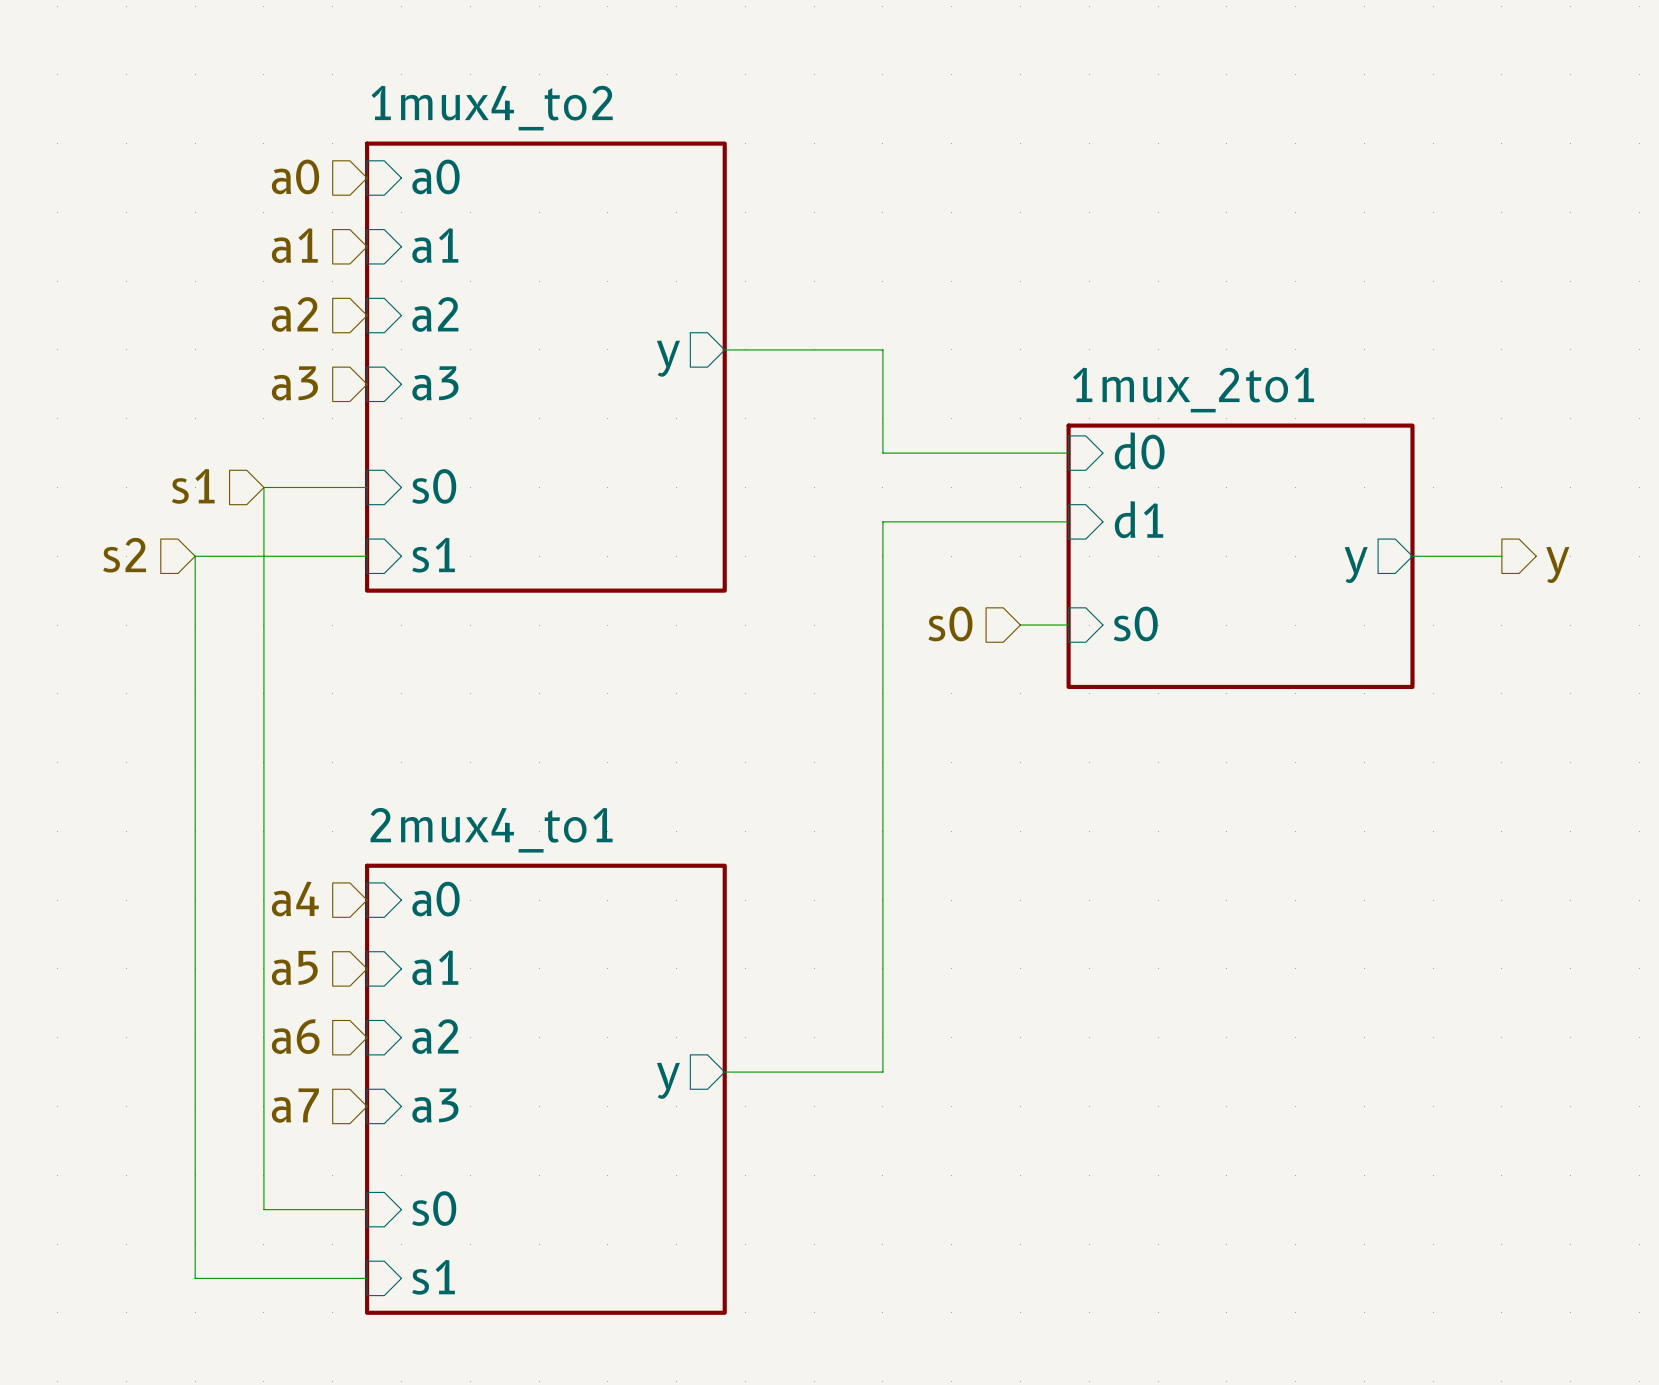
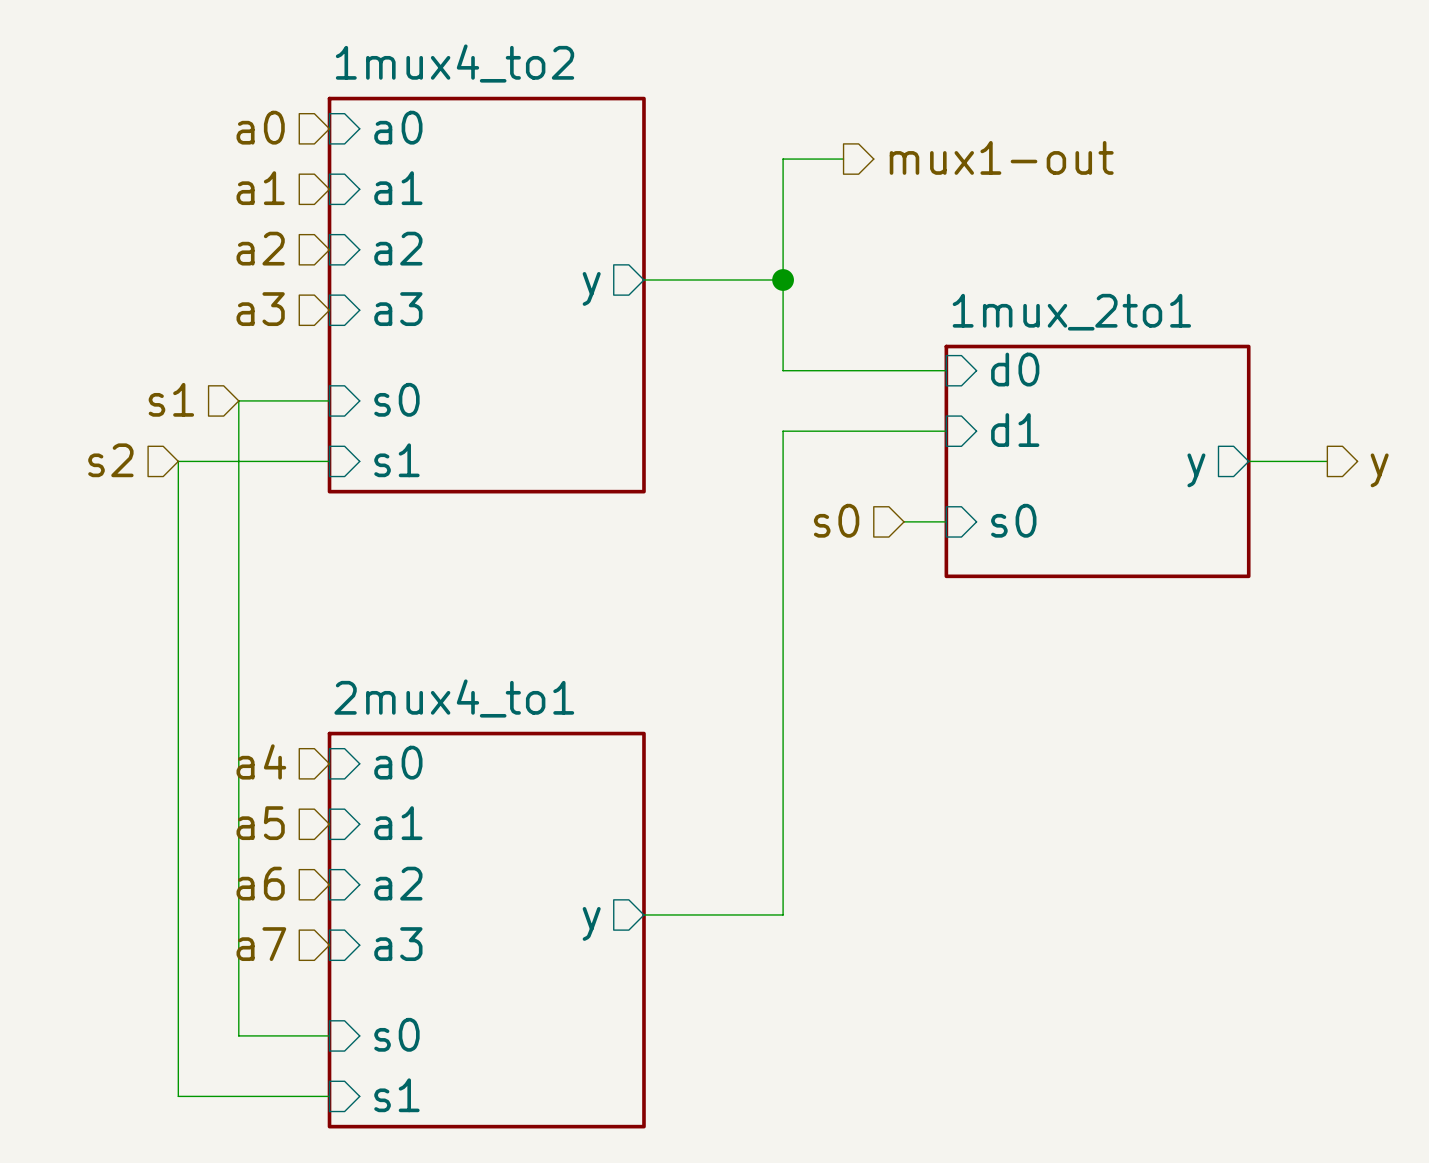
hierarchical label: none -> mux1-out (1001, 157)
wire: none -> (843, 159) (783, 159) (783, 279)
junction: none -> (783, 279)

